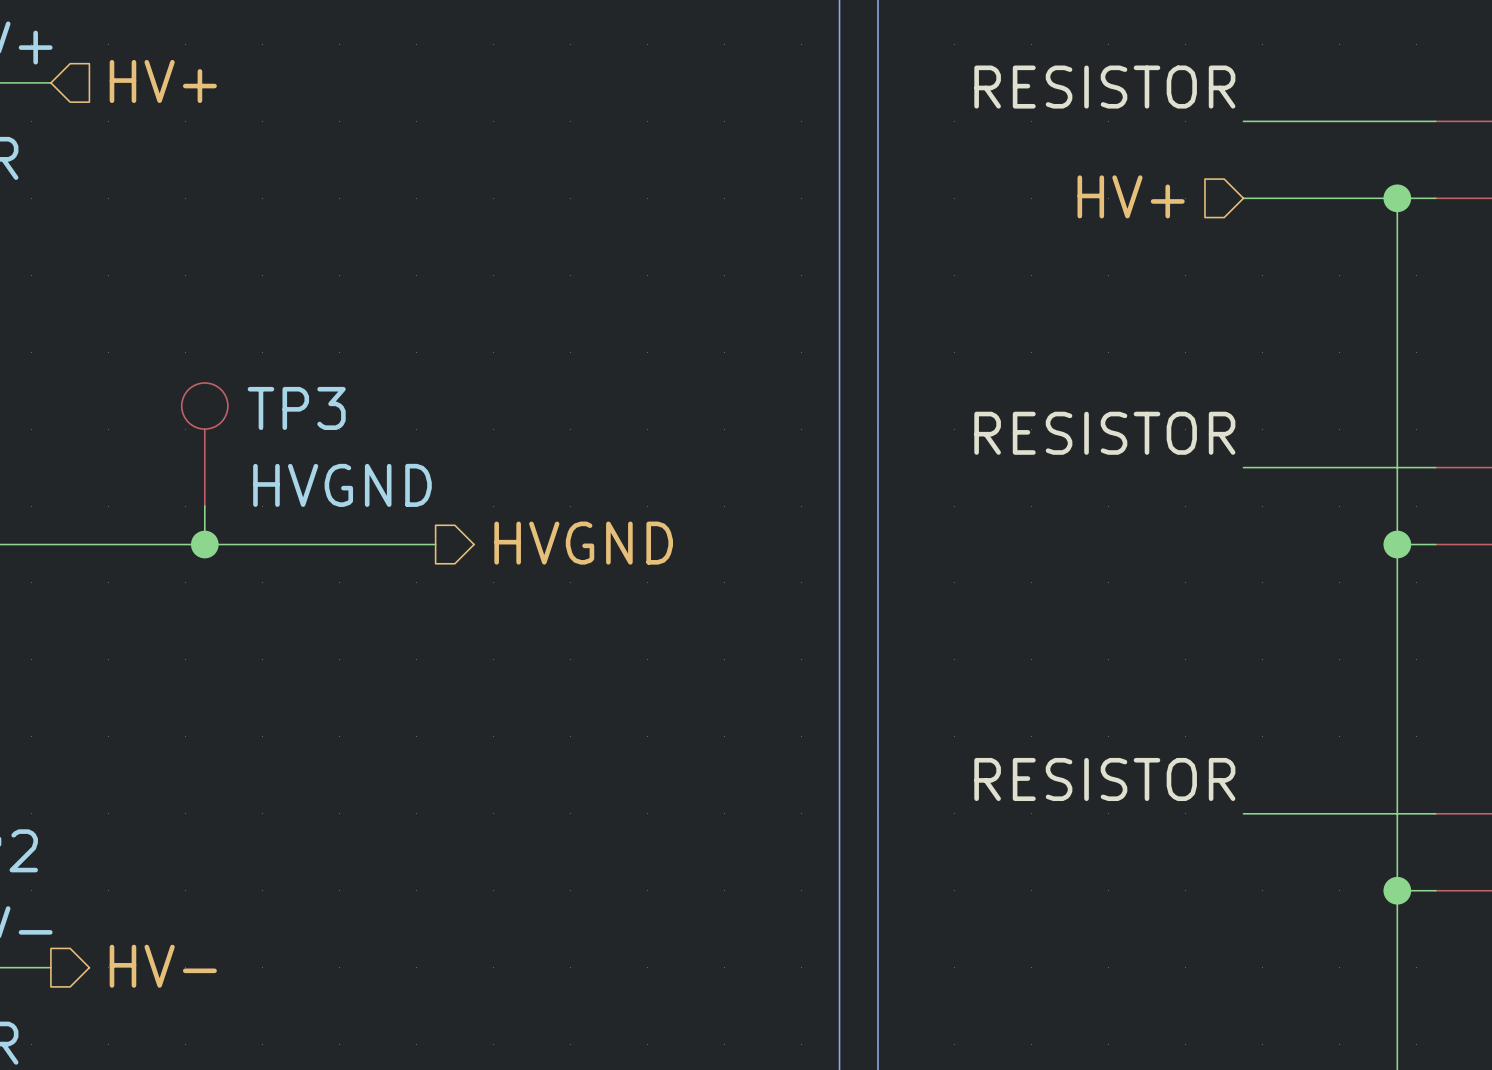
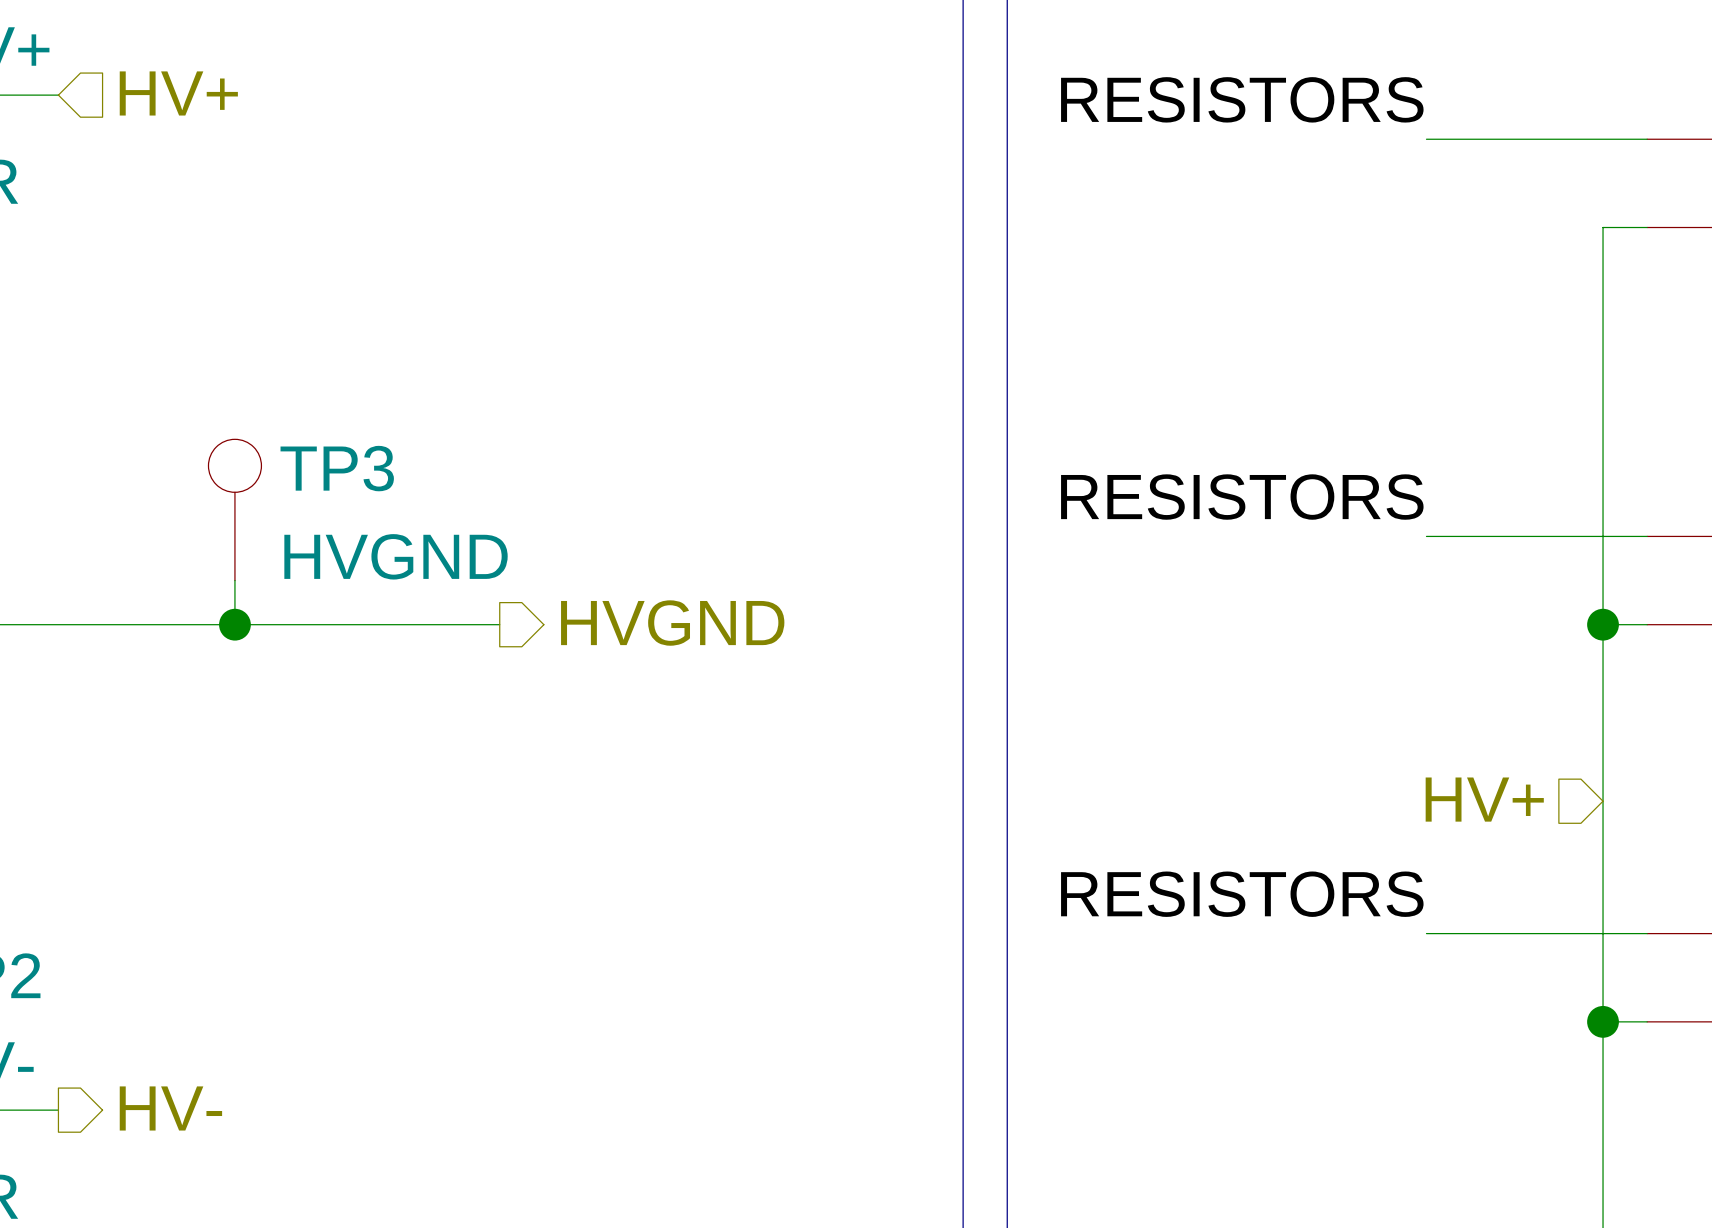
label: RESISTOR (1104, 87) -> RESISTORS (1242, 99)
hierarchical label position: HV+ (1131, 196) -> HV+ (1484, 799)
wire: (1243, 198) (1397, 198) -> none
junction: (1397, 198) -> none
label: RESISTOR (1104, 433) -> RESISTORS (1242, 497)
label: RESISTOR (1104, 779) -> RESISTORS (1242, 894)

